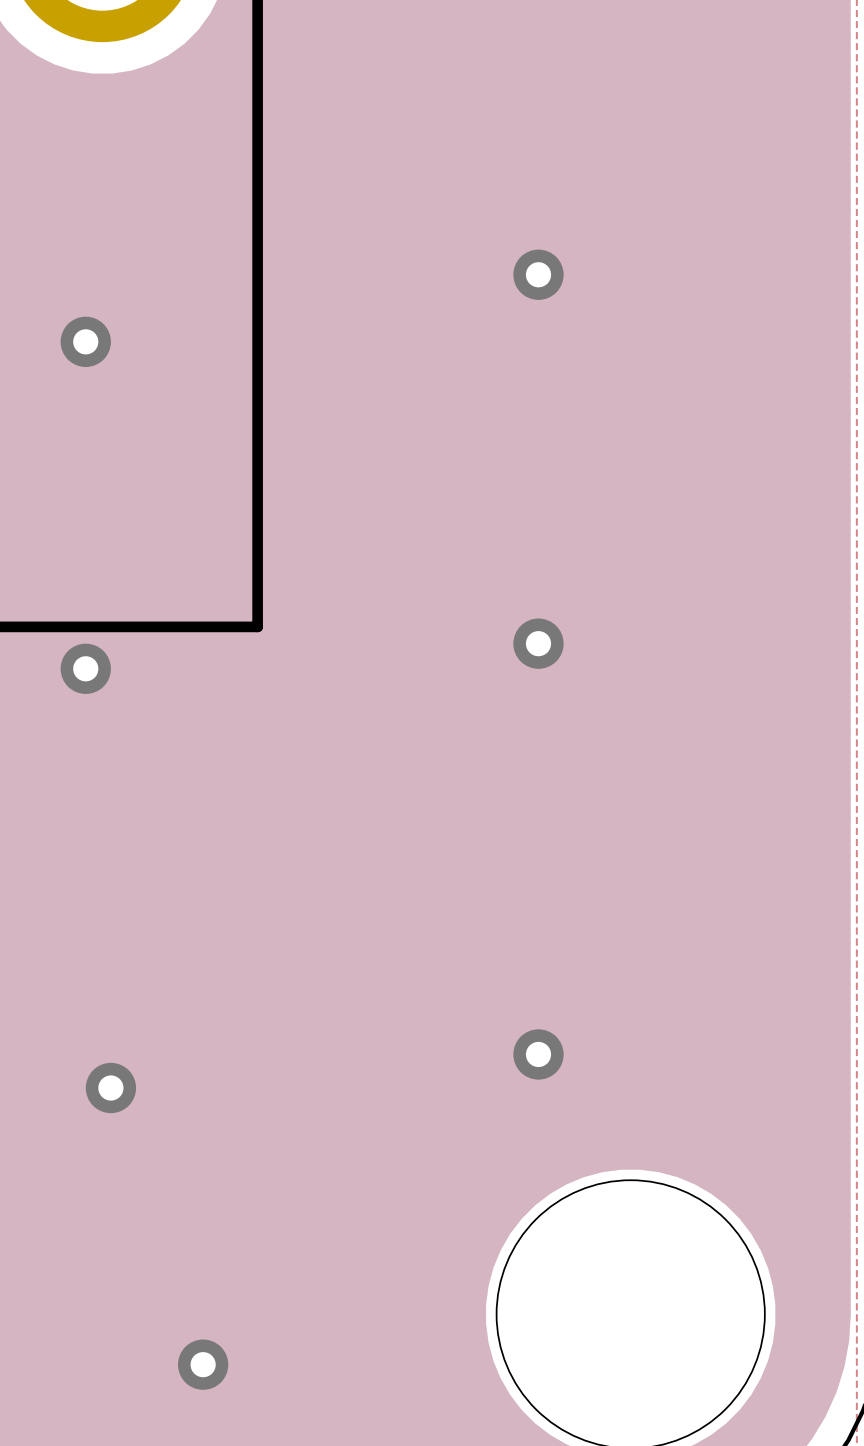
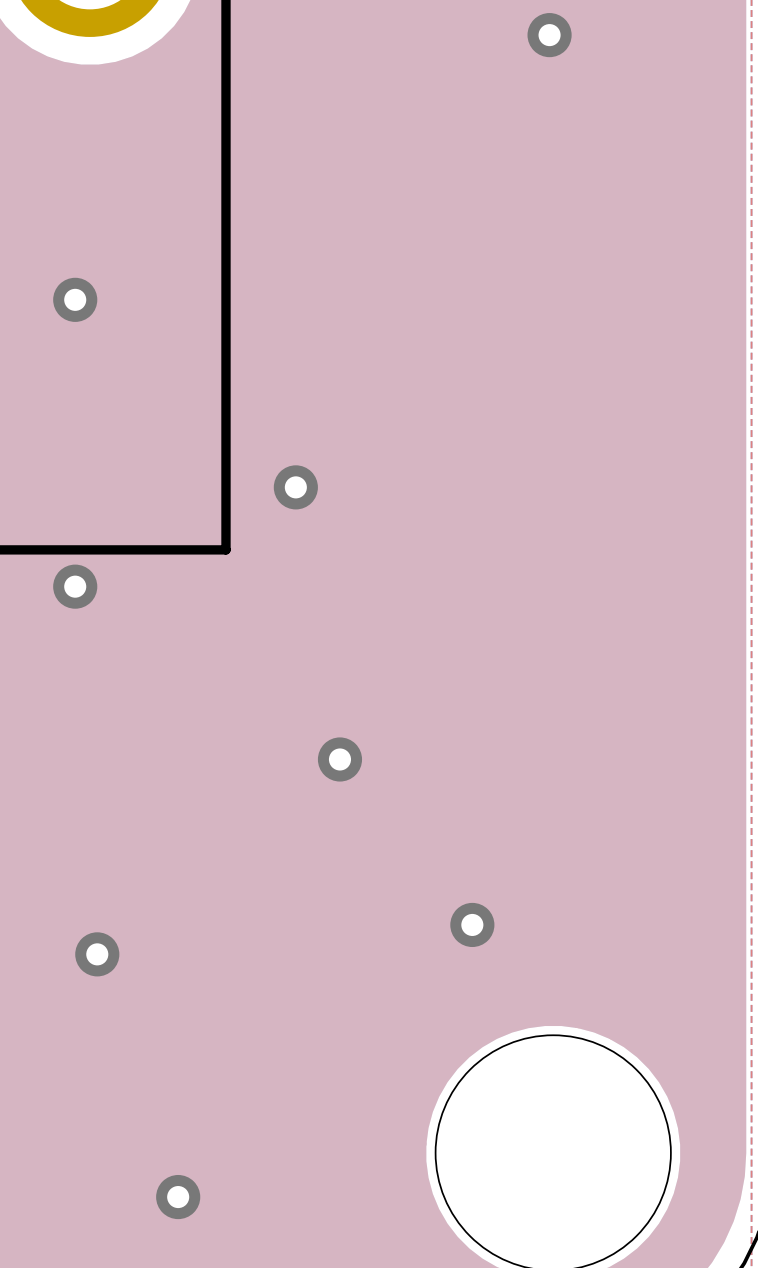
via: none -> (549, 35)
via: (538, 274) -> none
via: none -> (295, 487)
via: (538, 643) -> none
via: none -> (339, 759)

